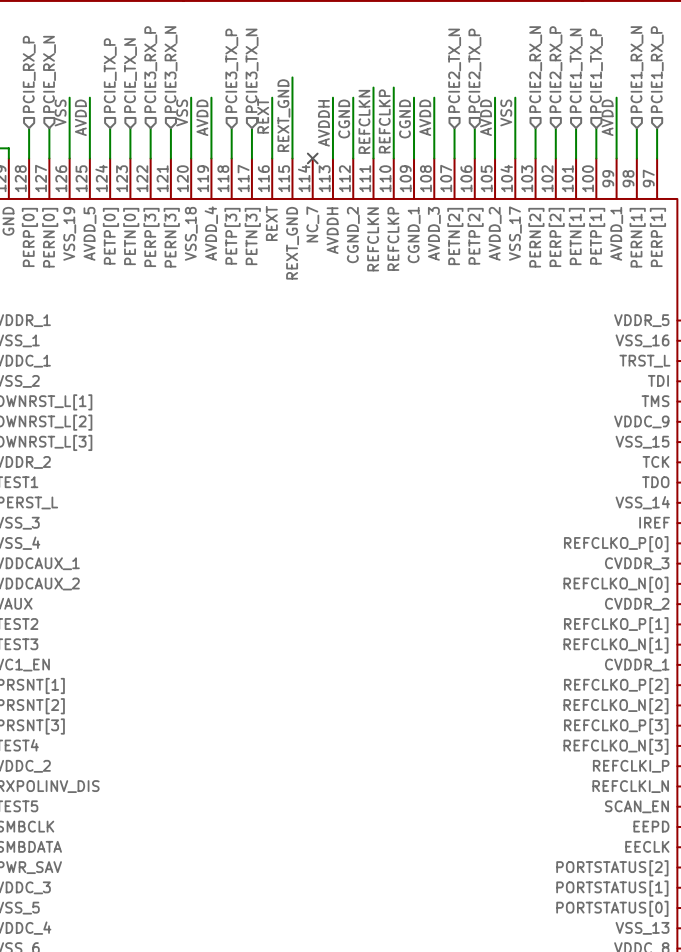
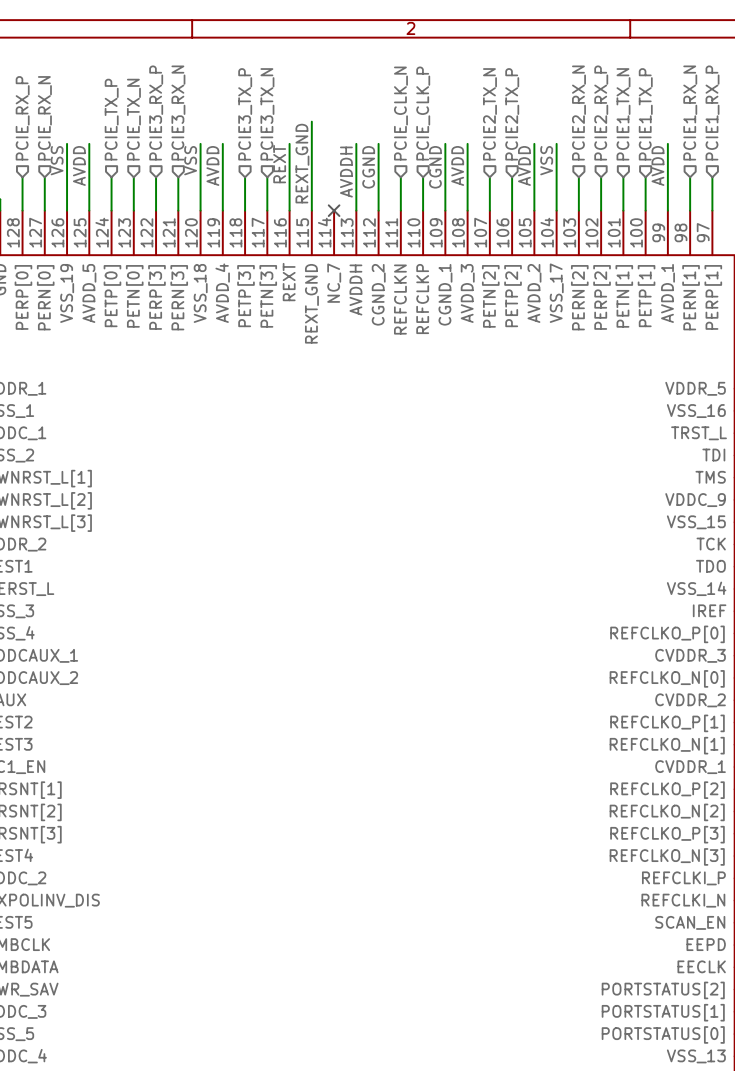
hierarchical label: none -> PCIE_CLK_N (400, 113)
hierarchical label: none -> PCIE_CLK_P (423, 113)
wire: (373, 87) (373, 128) -> none
wire: (393, 87) (393, 128) -> none
label: REFCLKN (364, 121) -> none
label: REFCLKP (384, 121) -> none

